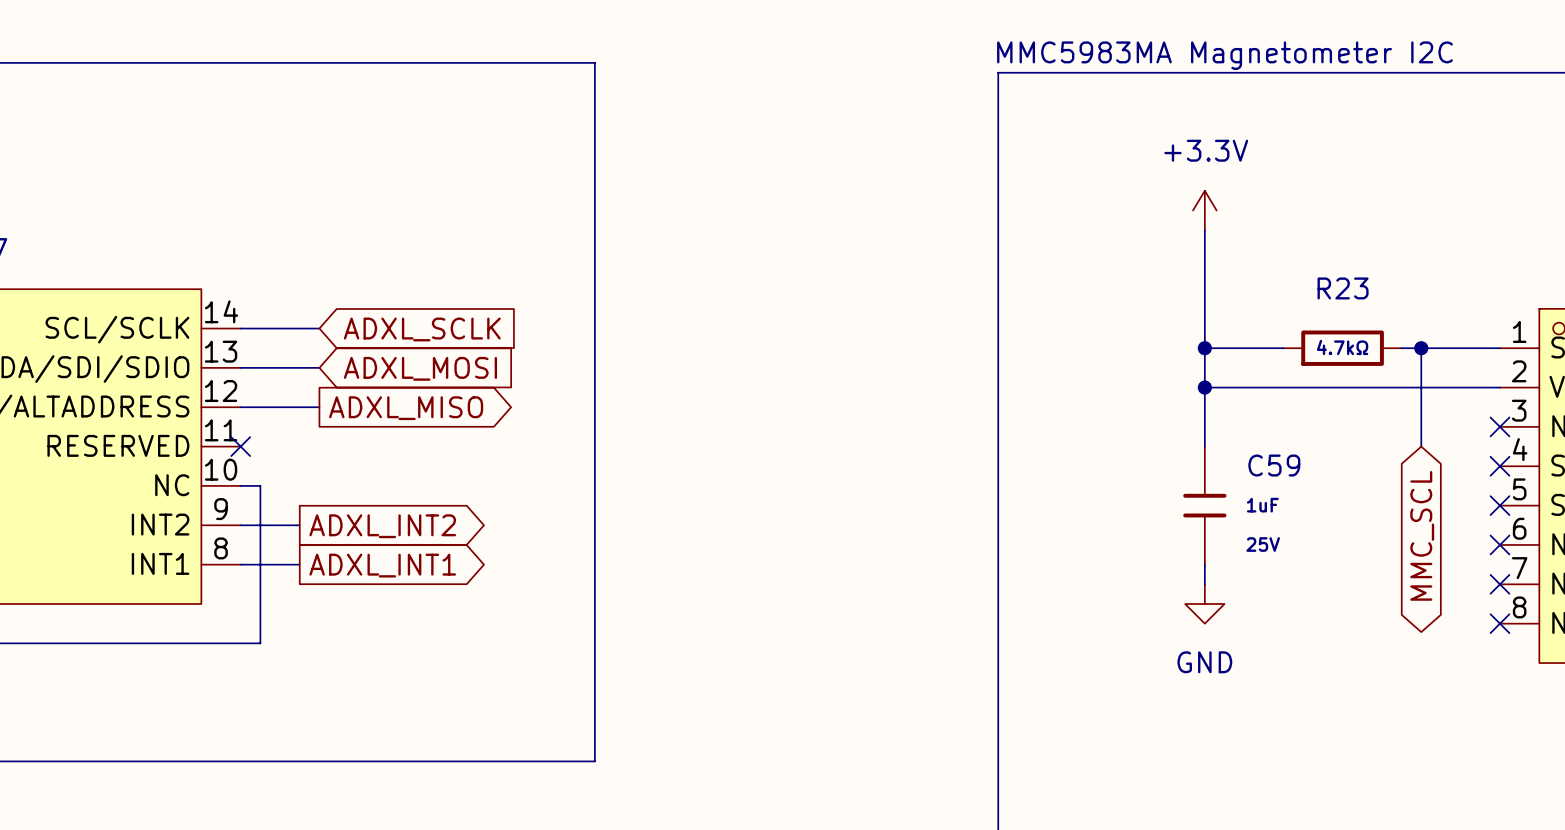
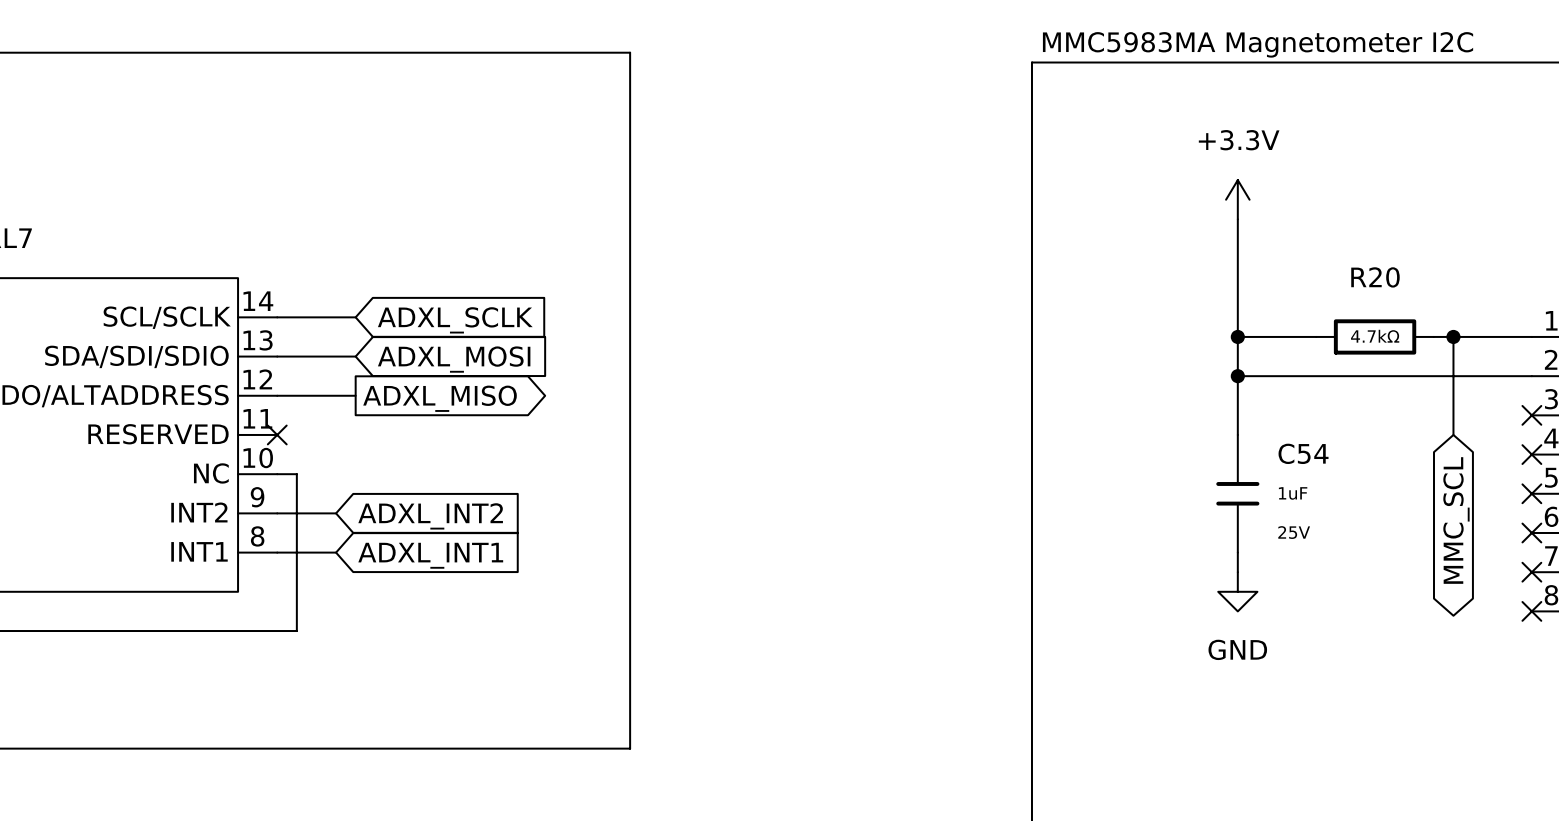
R23 name: R23 (1343, 288) -> R20 (1375, 277)
C59 name: C59 (1274, 465) -> C54 (1303, 453)
global label shape: output (382, 526) -> input (430, 516)
global label shape: output (382, 565) -> input (430, 555)

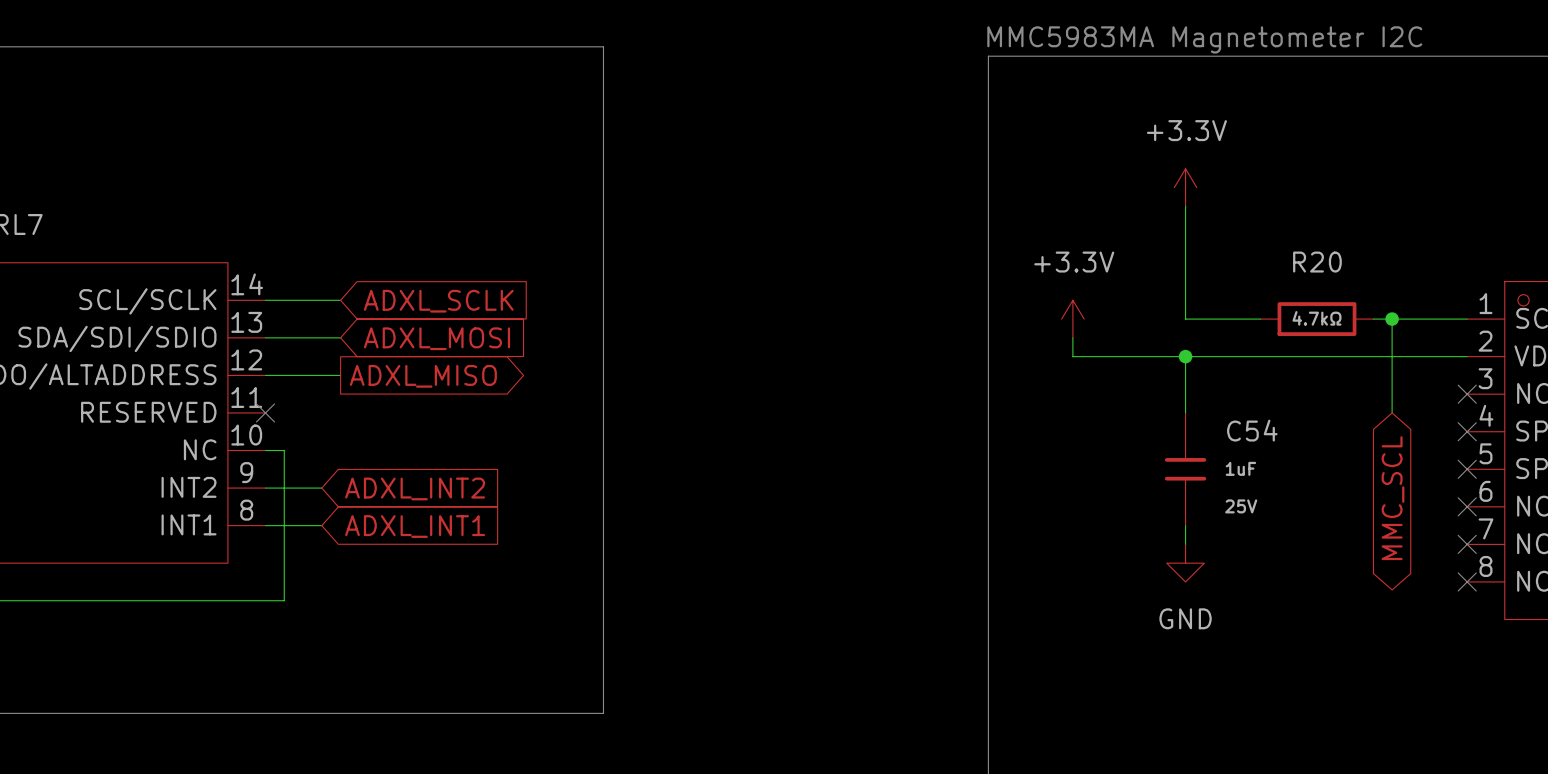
power symbol: none -> +3.3V (1072, 319)
wire: (1237, 336) (1237, 376) -> (1072, 337) (1072, 356) (1185, 356)
junction: (1237, 336) -> none

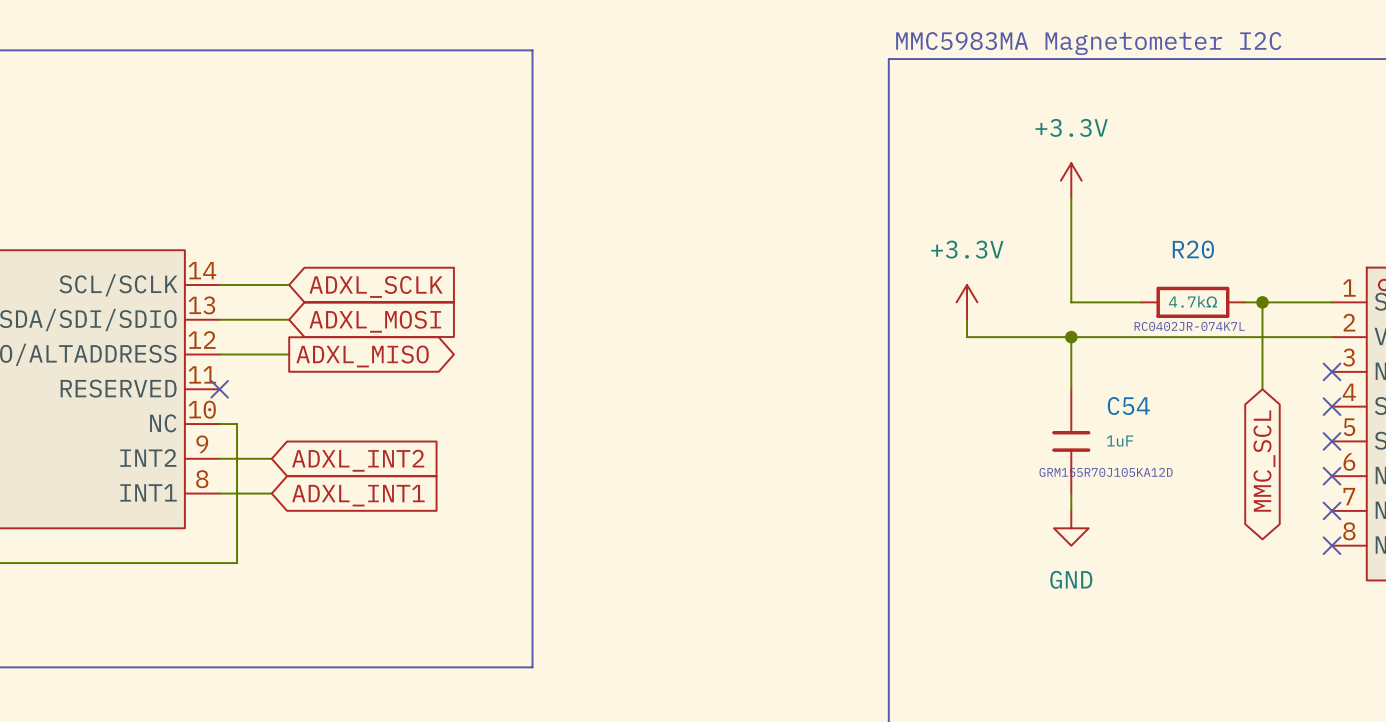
text: none -> RC0402JR-074K7L (1189, 326)
text: none -> GRM155R70J105KA12D (1106, 472)
C54 text: 25V (1241, 506) -> none

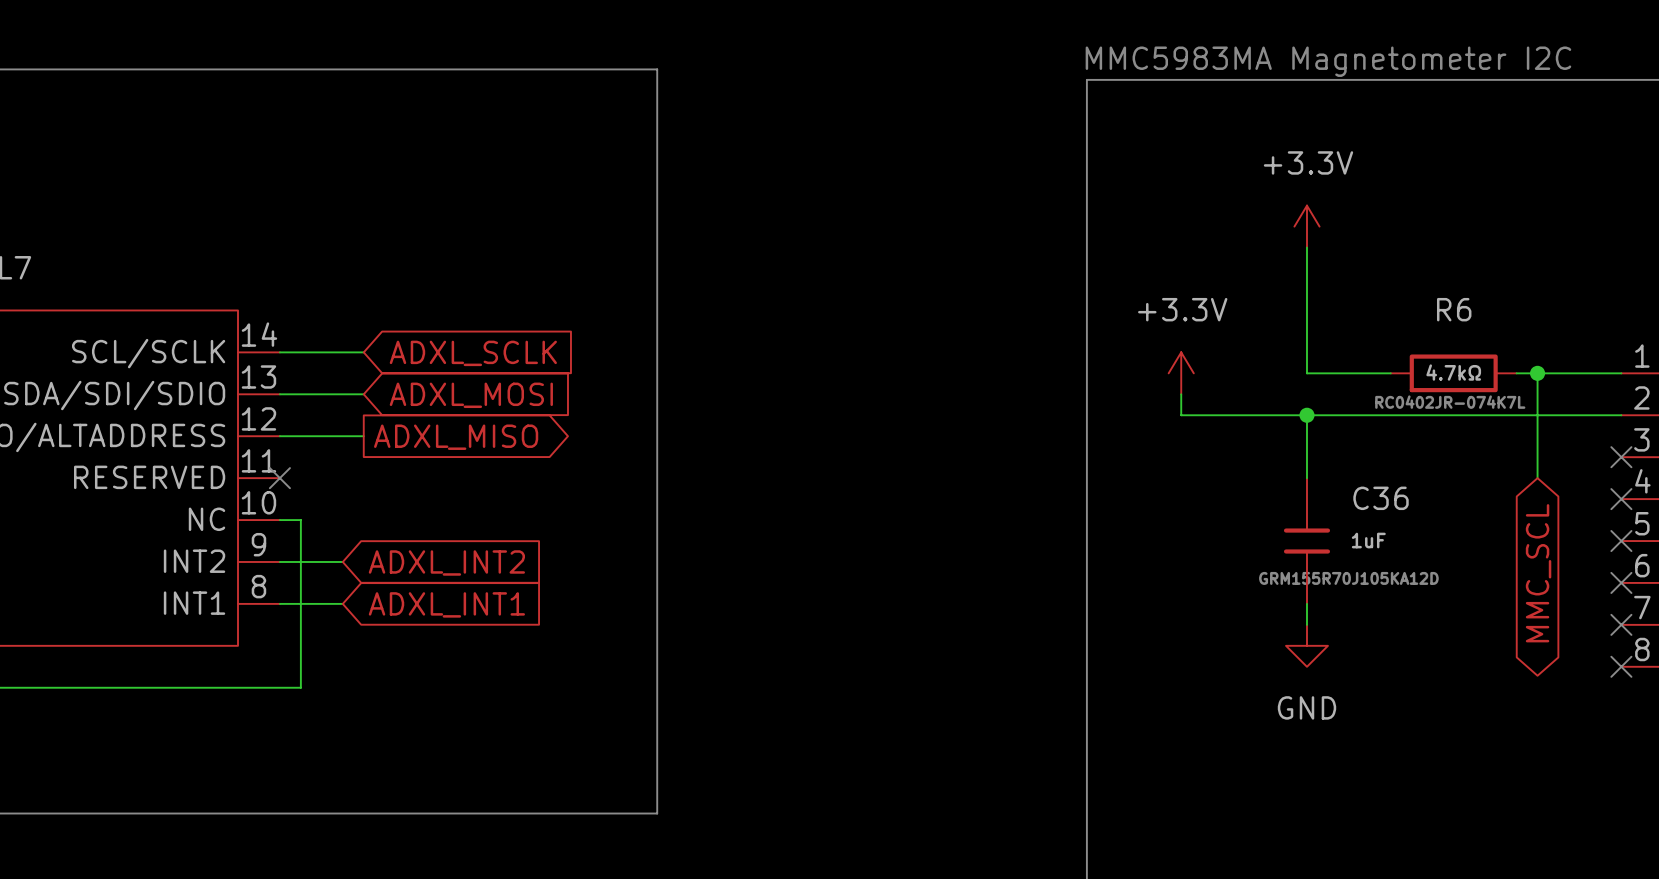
R20 name: R20 (1193, 249) -> R6 (1454, 309)
C54 name: C54 (1128, 406) -> C36 (1381, 498)

